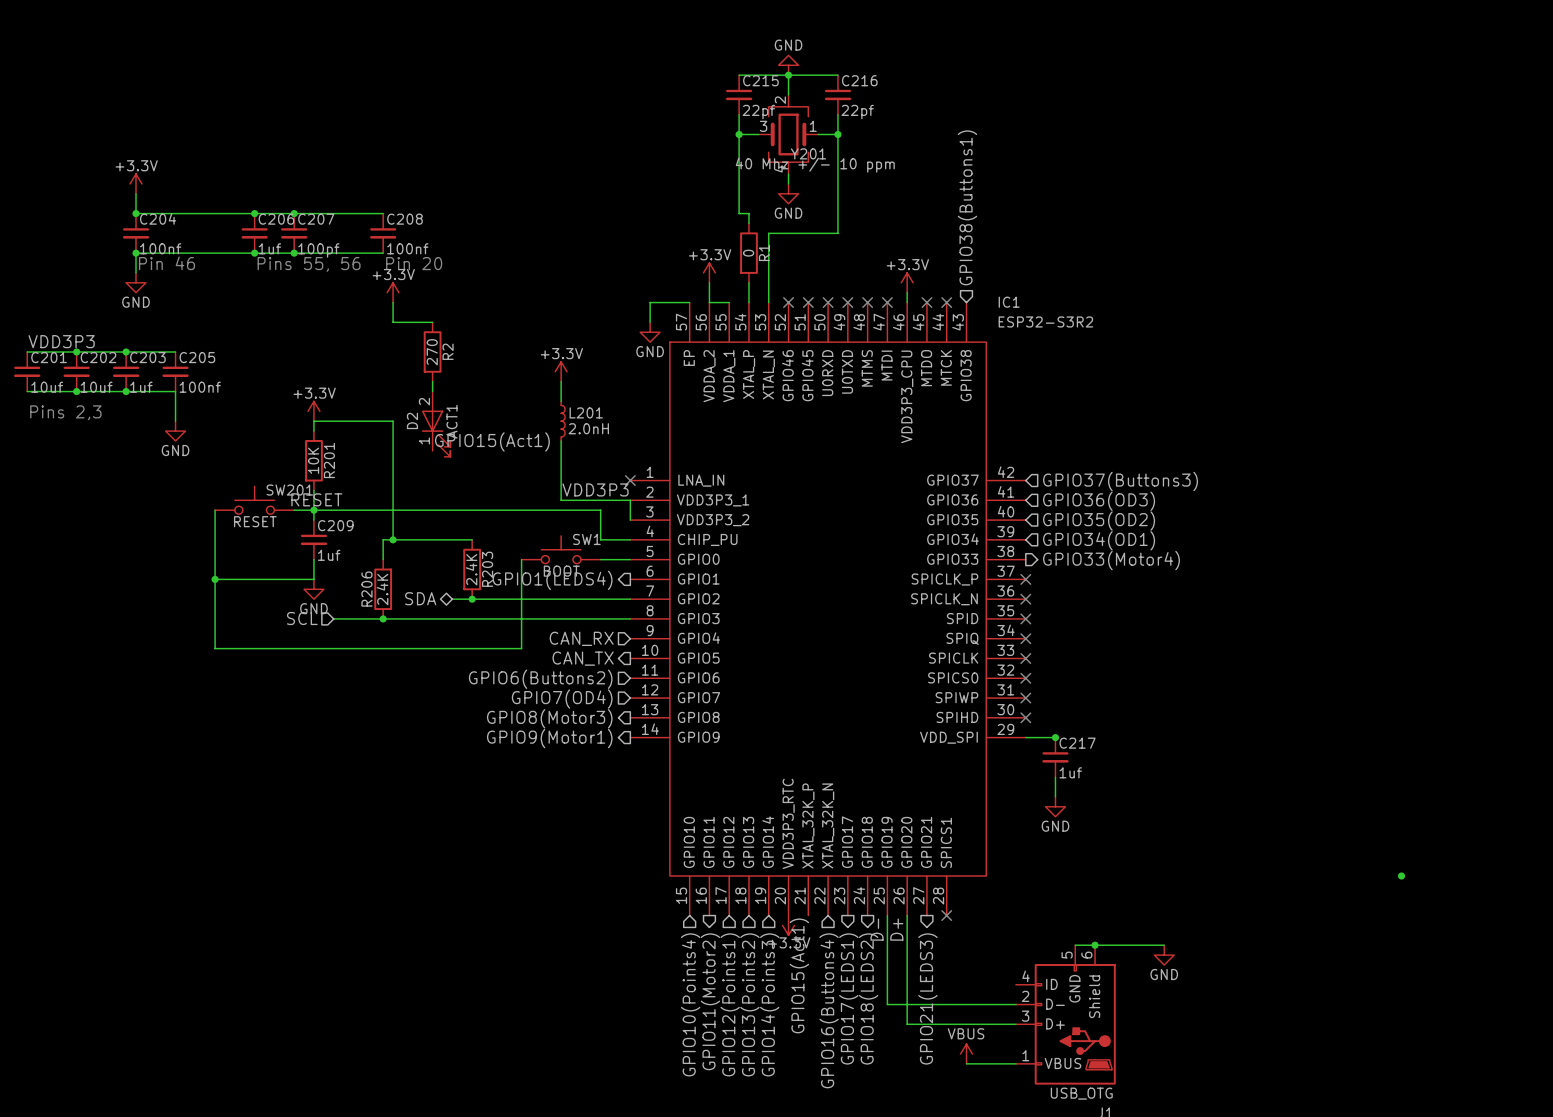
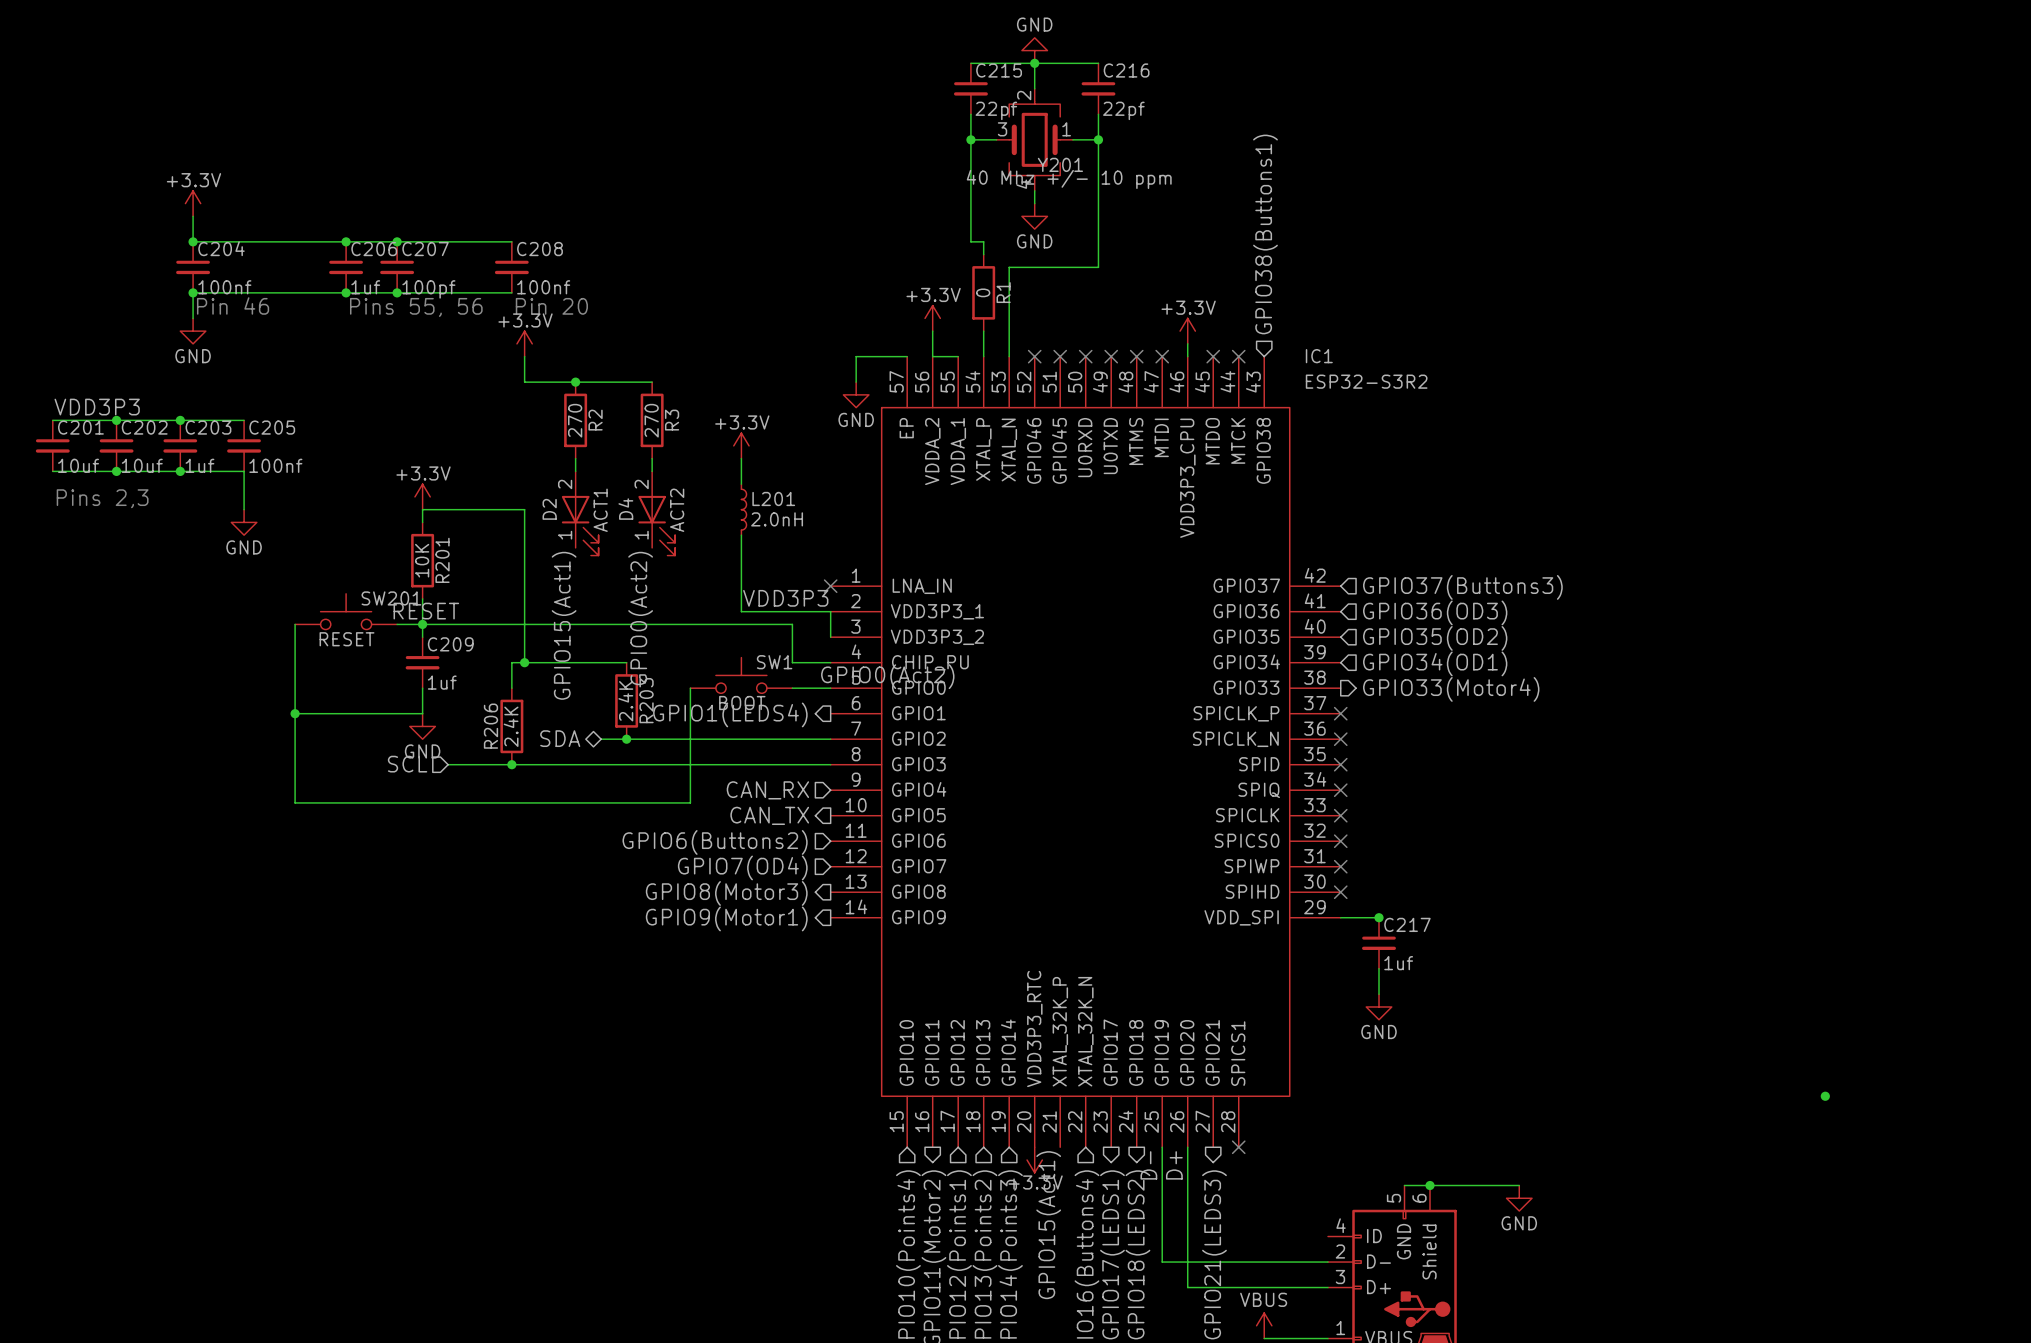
wire: none -> (575, 382) (652, 382)
junction: none -> (575, 382)
R3: none -> 270 (652, 420)
wire: none -> (652, 458) (652, 471)
D4: none -> ACT2 (656, 513)
label rotation: 0° (492, 441) -> 90° counterclockwise (564, 625)
label: none -> GPIO0(Act2) (640, 618)
label: none -> GPIO0(Act2) (887, 676)

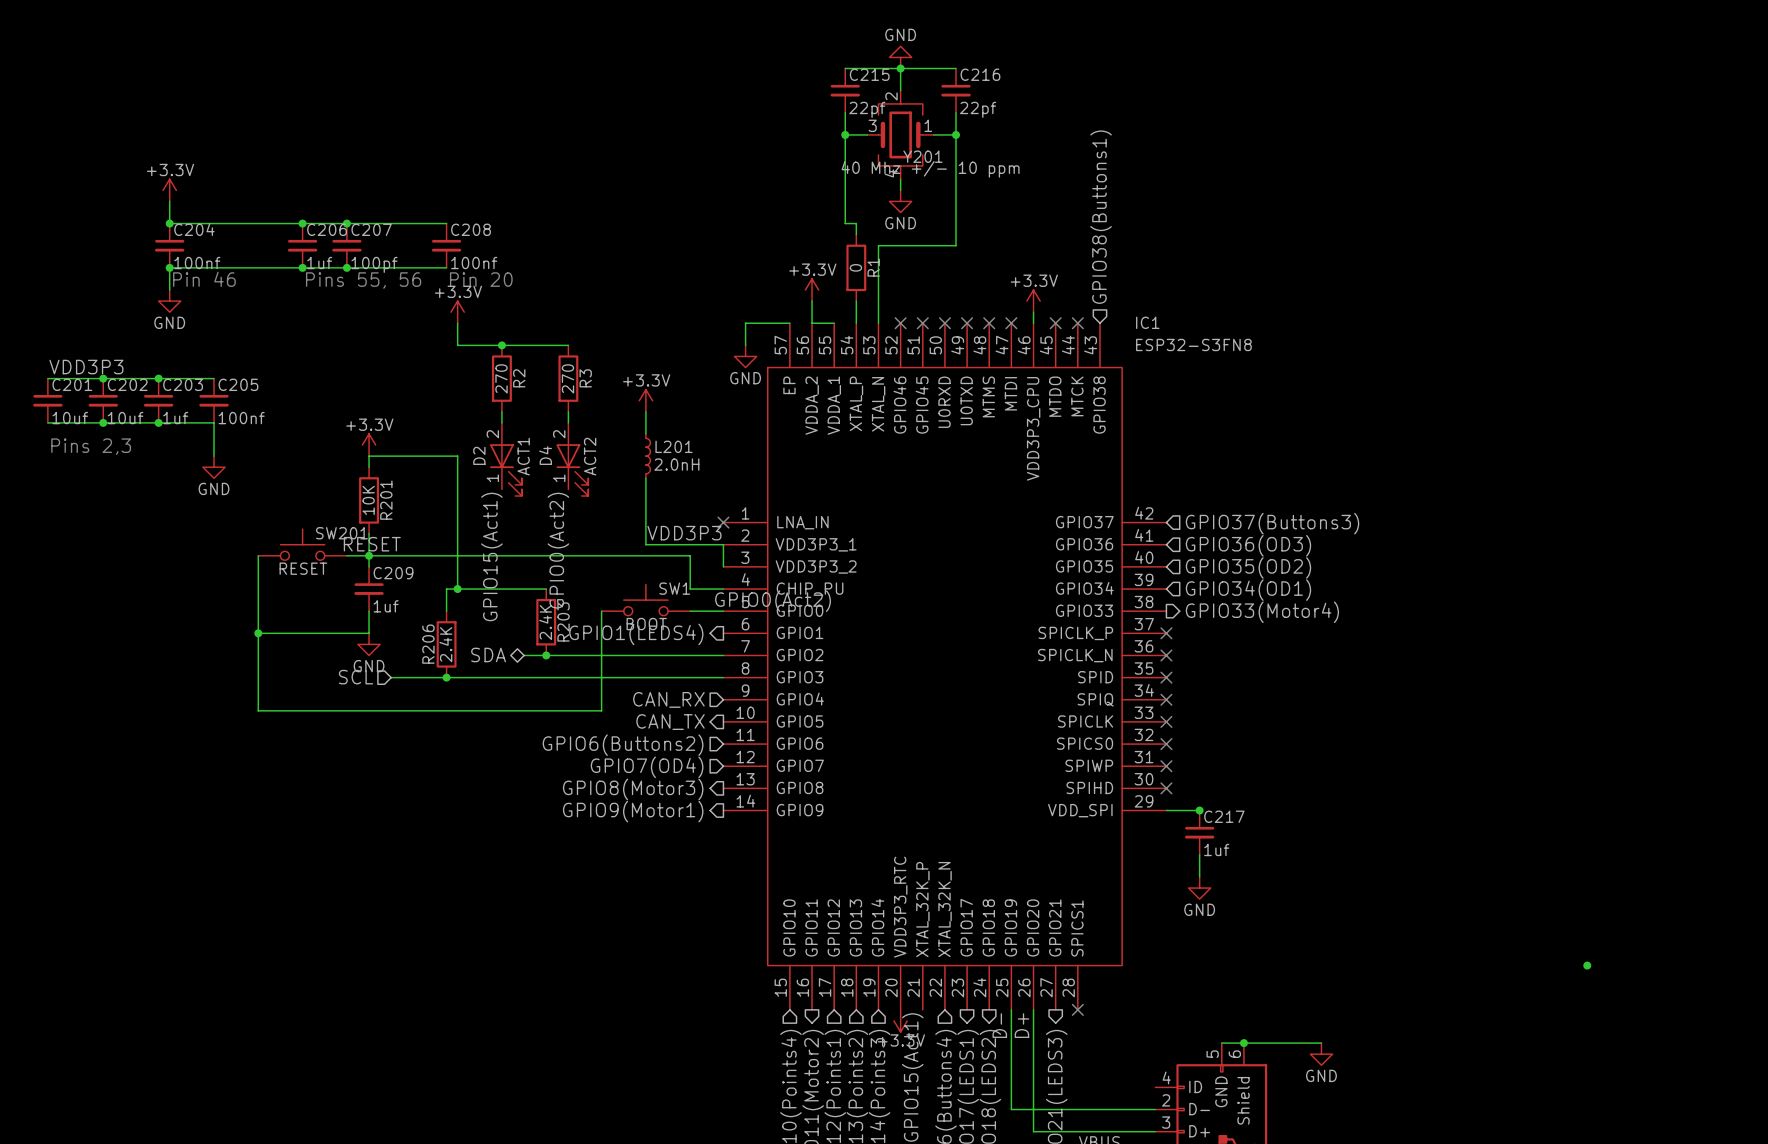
IC1 value: ESP32-S3R2 (1366, 381) -> ESP32-S3FN8 (1193, 344)

